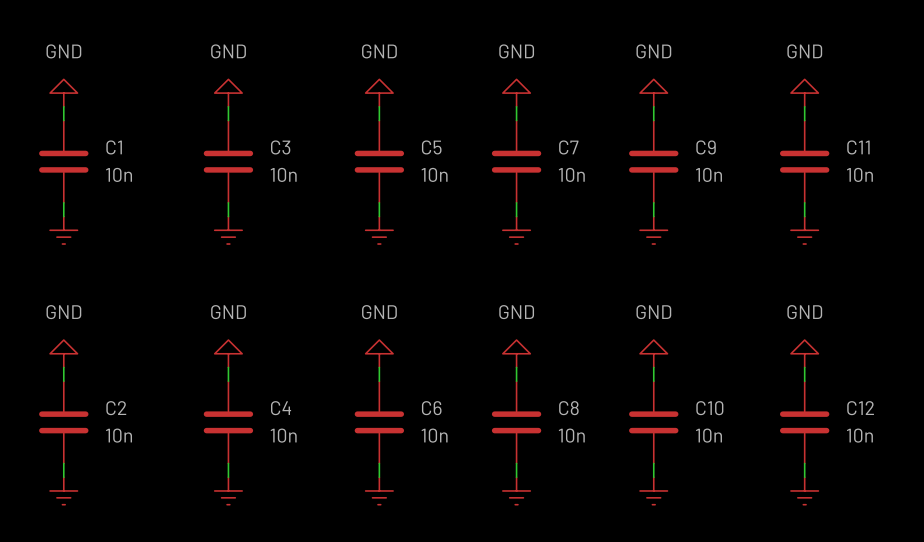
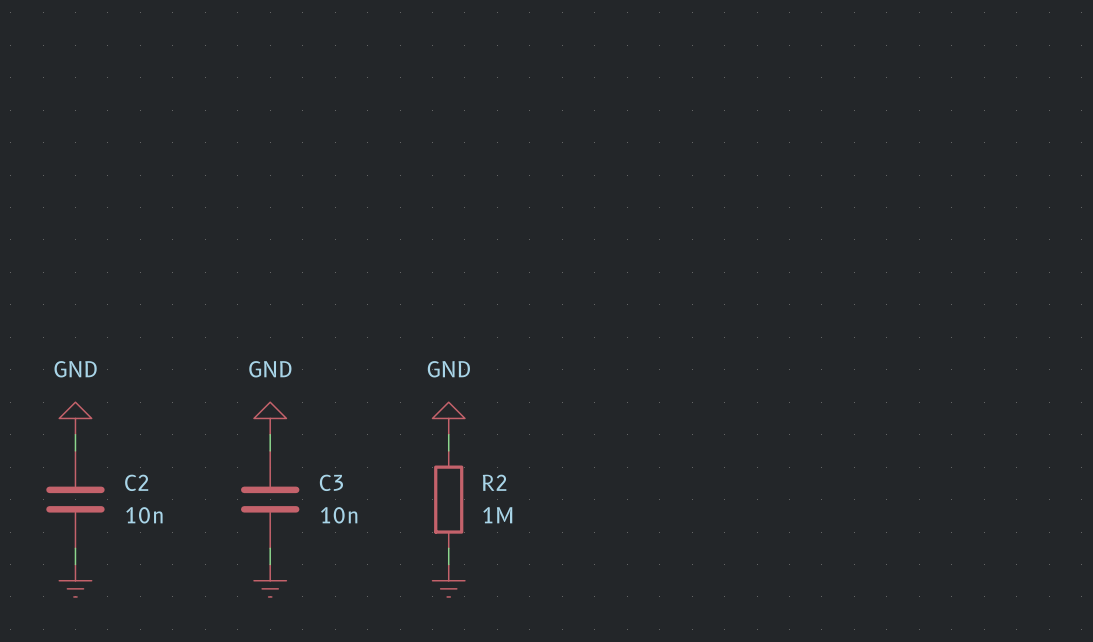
power symbol: GND (63, 93) -> none
power symbol: GND (228, 93) -> none
power symbol: GND (379, 93) -> none
power symbol: GND (516, 93) -> none
power symbol: GND (653, 93) -> none
power symbol: GND (804, 93) -> none
wire: (63, 106) (63, 120) -> none
wire: (228, 106) (228, 120) -> none
wire: (379, 106) (379, 120) -> none
wire: (516, 106) (516, 120) -> none
wire: (653, 106) (653, 120) -> none
wire: (804, 106) (804, 120) -> none
C1: 10n (63, 161) -> none
C3: 10n (228, 161) -> none
C5: 10n (379, 161) -> none
C7: 10n (516, 161) -> none
C9: 10n (653, 161) -> none
C11: 10n (804, 161) -> none
wire: (63, 202) (63, 216) -> none
wire: (228, 202) (228, 216) -> none
wire: (379, 202) (379, 216) -> none
wire: (516, 202) (516, 216) -> none
wire: (653, 202) (653, 216) -> none
wire: (804, 202) (804, 216) -> none
power symbol: (63, 230) -> none
power symbol: (228, 230) -> none
power symbol: (379, 230) -> none
power symbol: (516, 230) -> none
power symbol: (653, 230) -> none
power symbol: (804, 230) -> none
power symbol: GND (516, 353) -> none
power symbol: GND (653, 353) -> none
power symbol: GND (804, 353) -> none
wire: (516, 367) (516, 381) -> none
wire: (653, 367) (653, 381) -> none
wire: (804, 367) (804, 381) -> none
C4 name: C4 (281, 408) -> C3 (331, 482)
C6: 10n (379, 422) -> none
R2: none -> 1M (448, 499)
C8: 10n (516, 422) -> none
C10: 10n (653, 422) -> none
C12: 10n (804, 422) -> none
wire: (516, 463) (516, 477) -> none
wire: (653, 463) (653, 477) -> none
wire: (804, 463) (804, 477) -> none
power symbol: (516, 490) -> none
power symbol: (653, 490) -> none
power symbol: (804, 490) -> none

